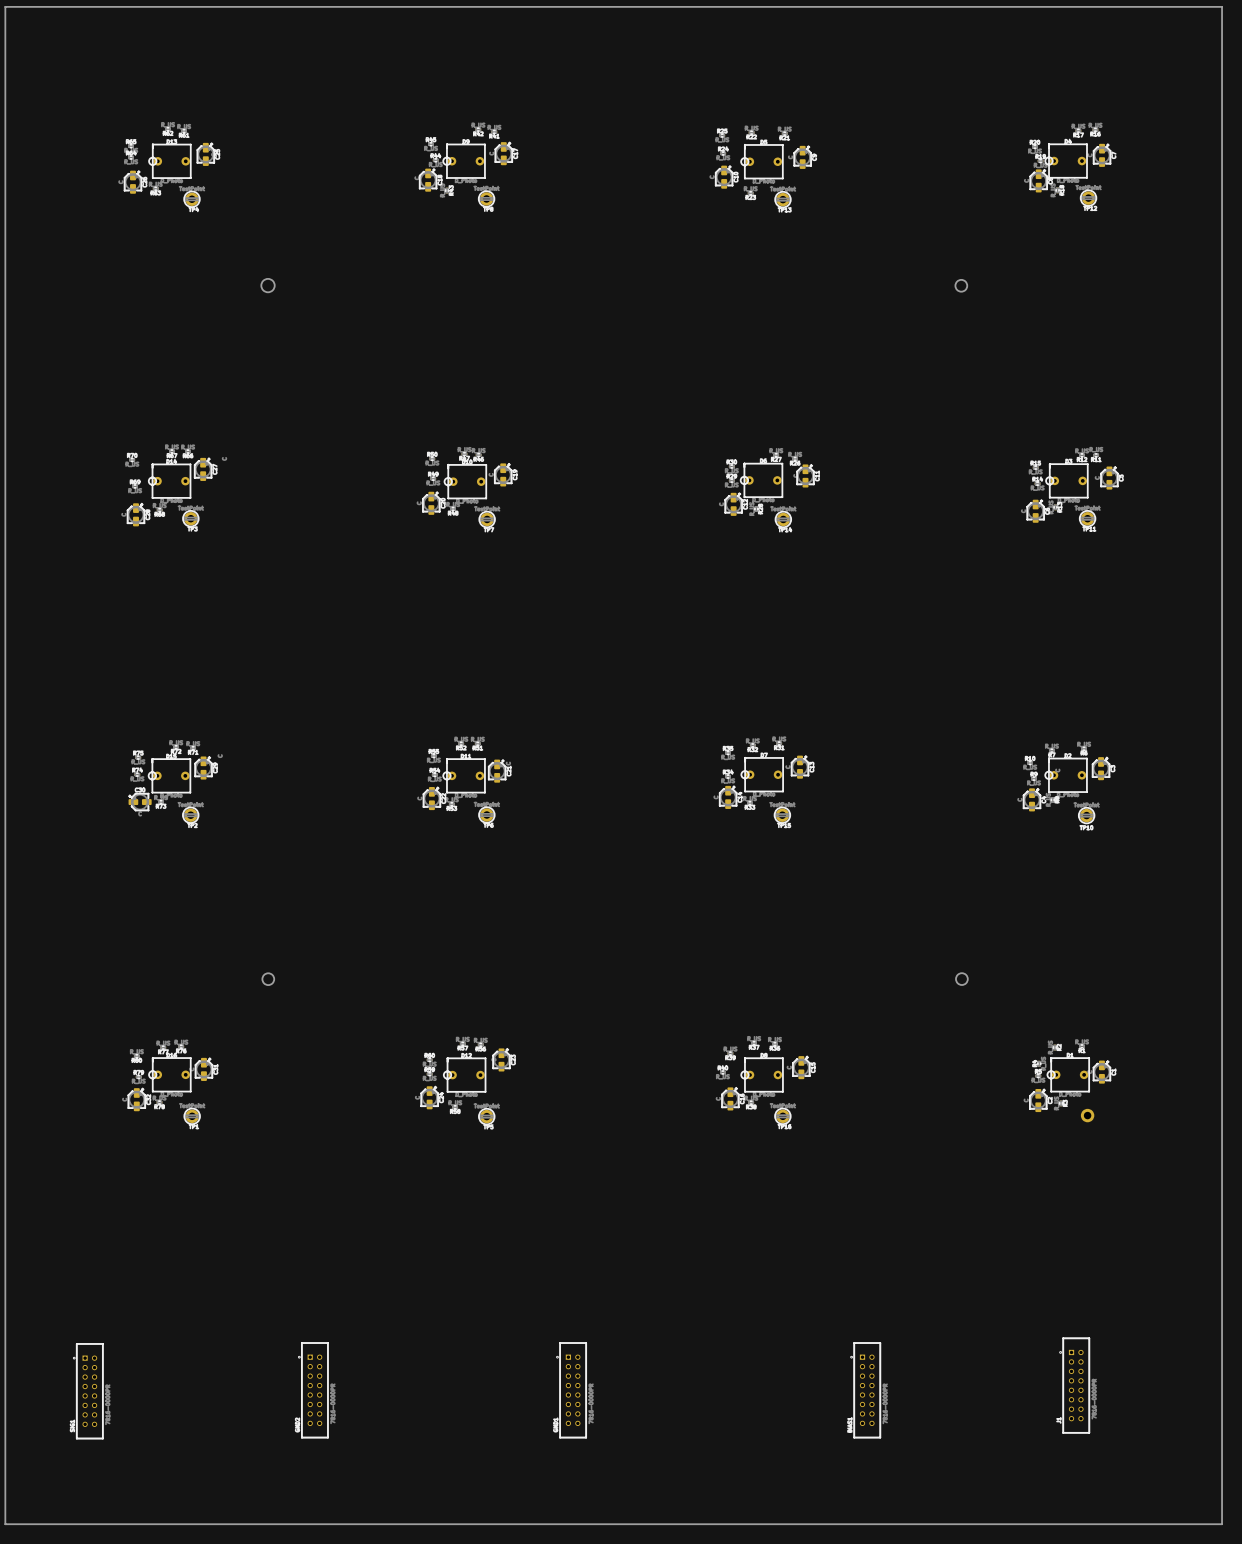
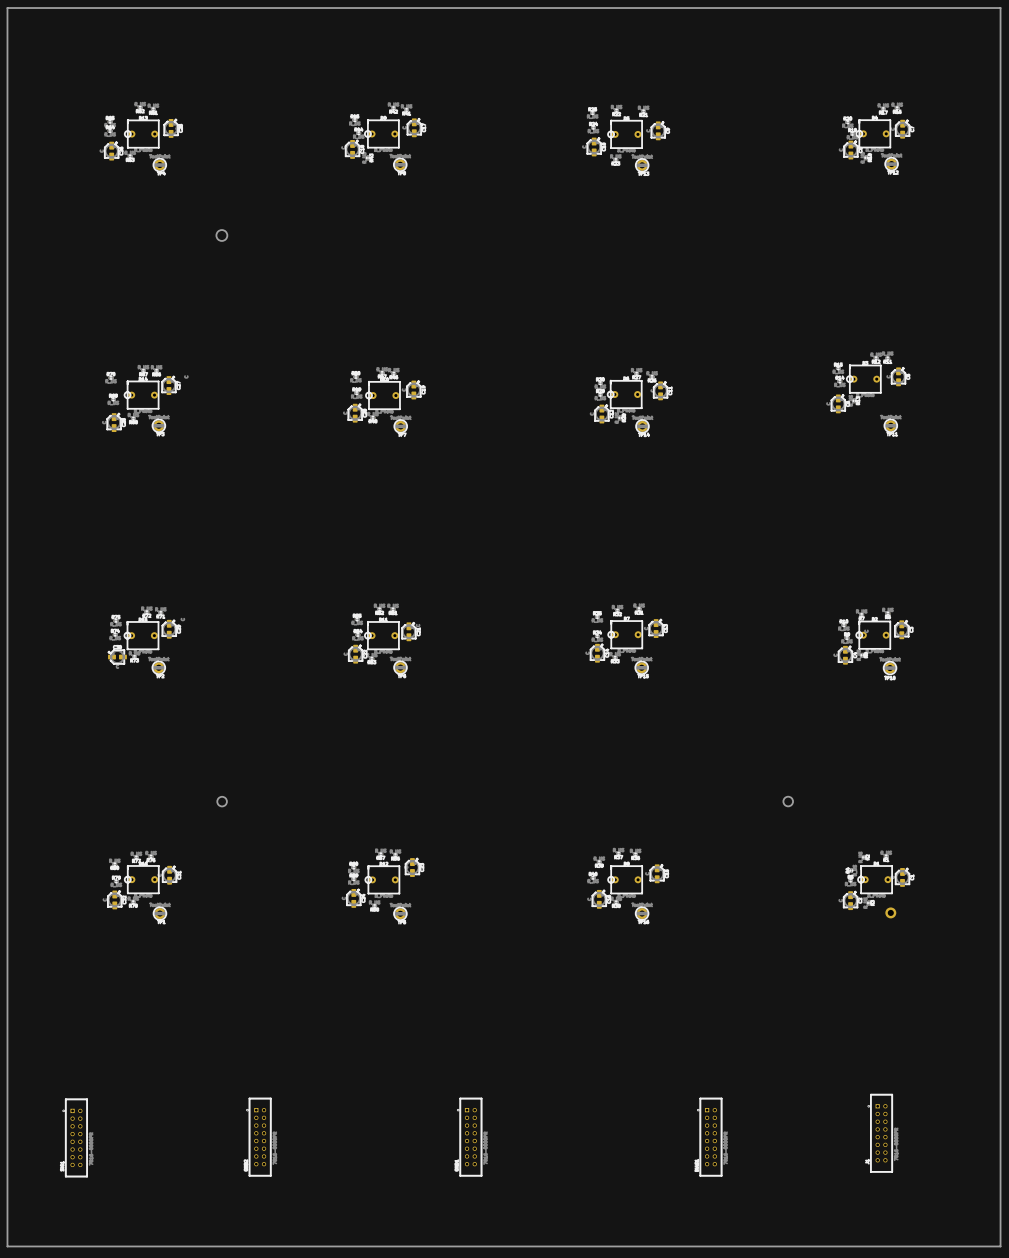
round board edge: [955, 279, 968, 292] -> none
part position: (1082, 455) -> (876, 358)
part position: (1096, 455) -> (887, 358)
part position: (1035, 467) -> (838, 368)
part position: (1109, 478) -> (898, 376)
part position: (1066, 480) -> (863, 379)
part position: (1037, 483) -> (839, 381)
part position: (1055, 507) -> (854, 400)
part position: (1035, 511) -> (838, 403)

